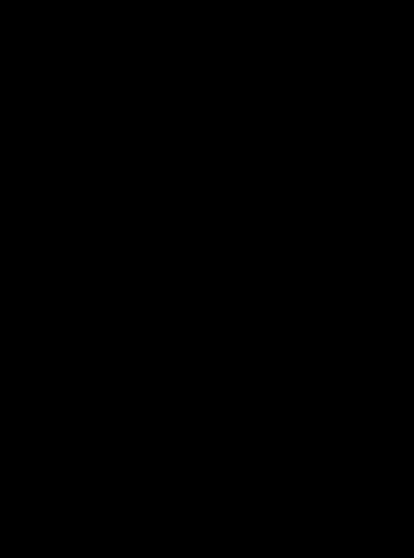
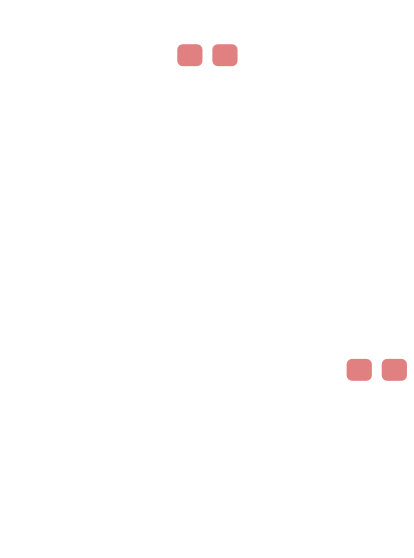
part: none -> (207, 55)
part: none -> (376, 369)

